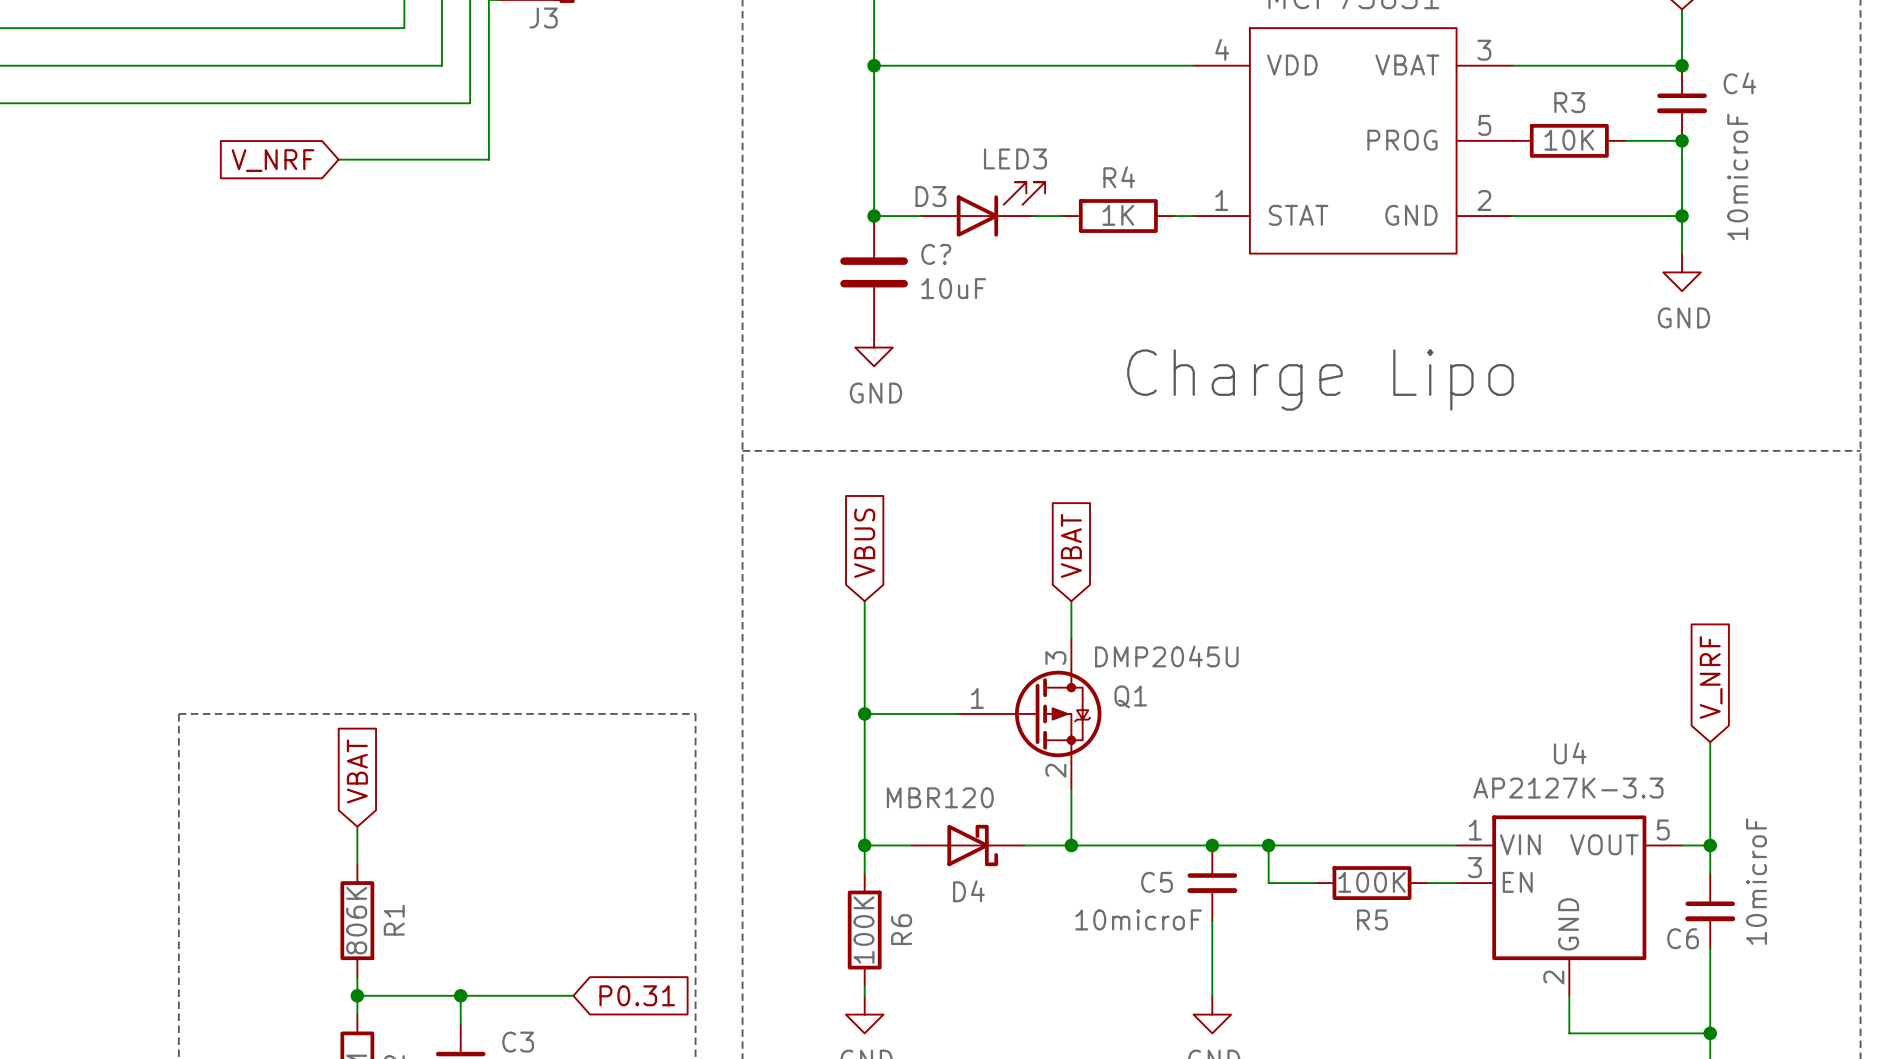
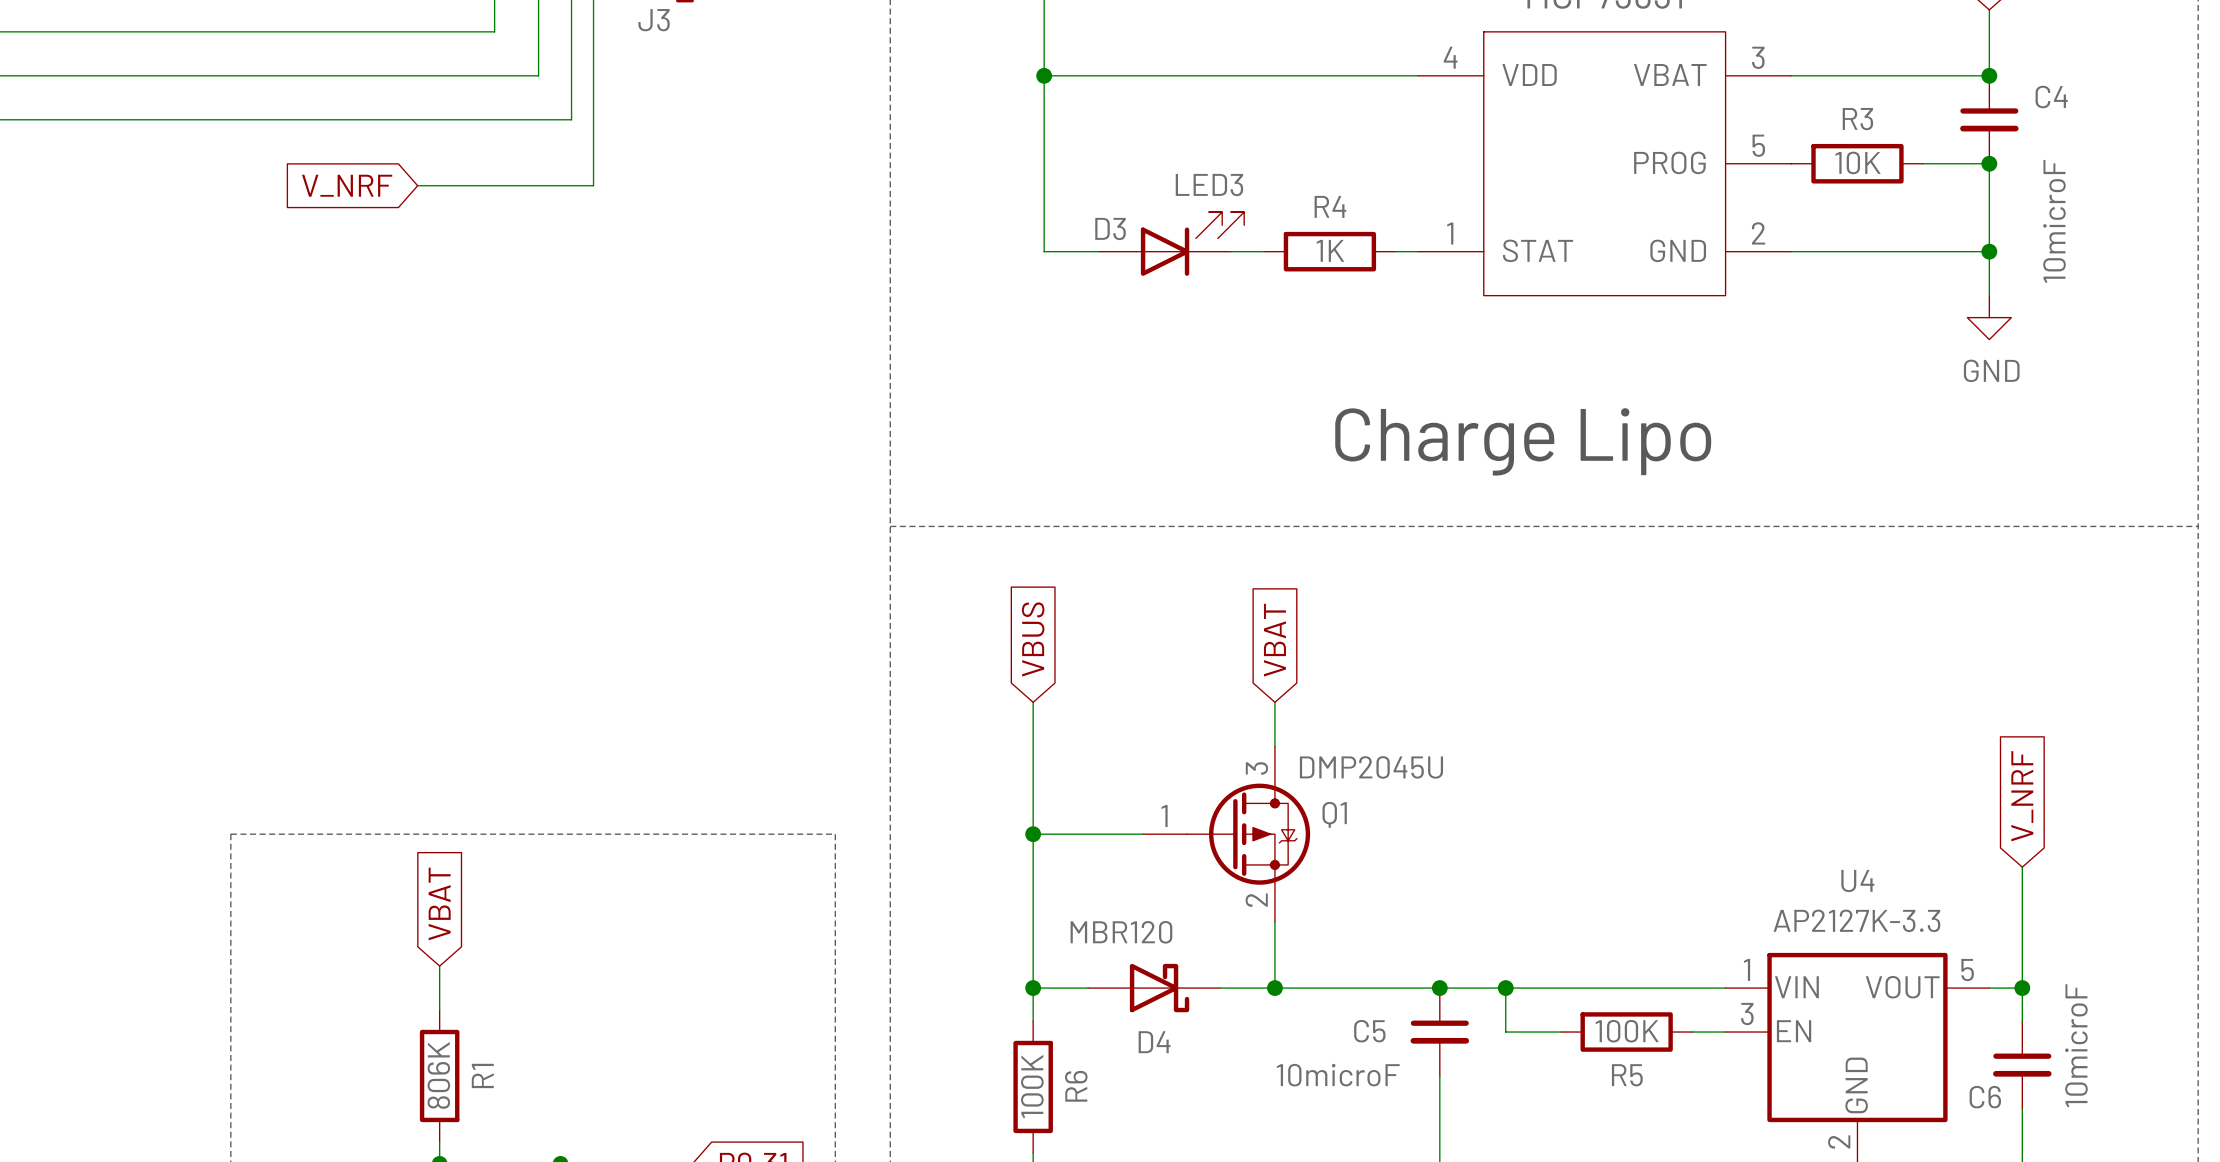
junction: (874, 216) -> none
C?: 10uF (874, 272) -> none
power symbol: GND (874, 347) -> none

